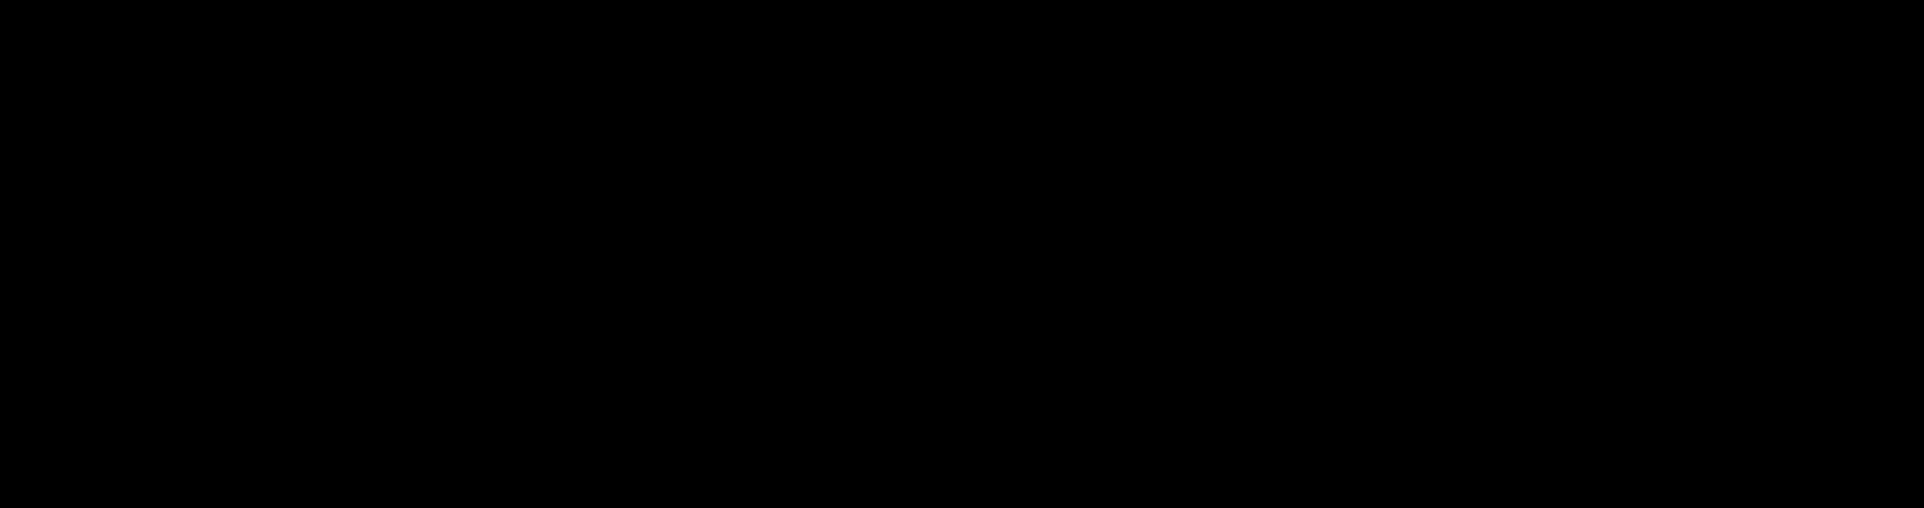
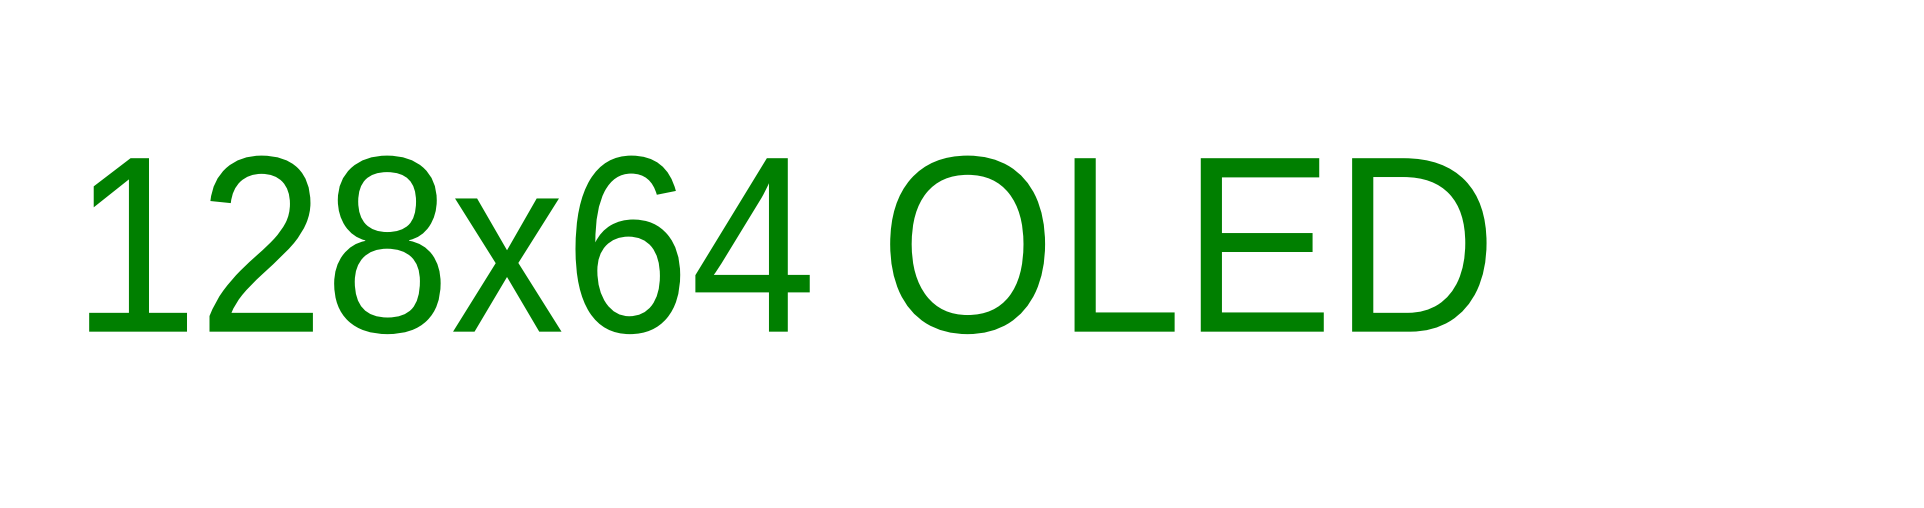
text: none -> 128x64 OLED (787, 244)

